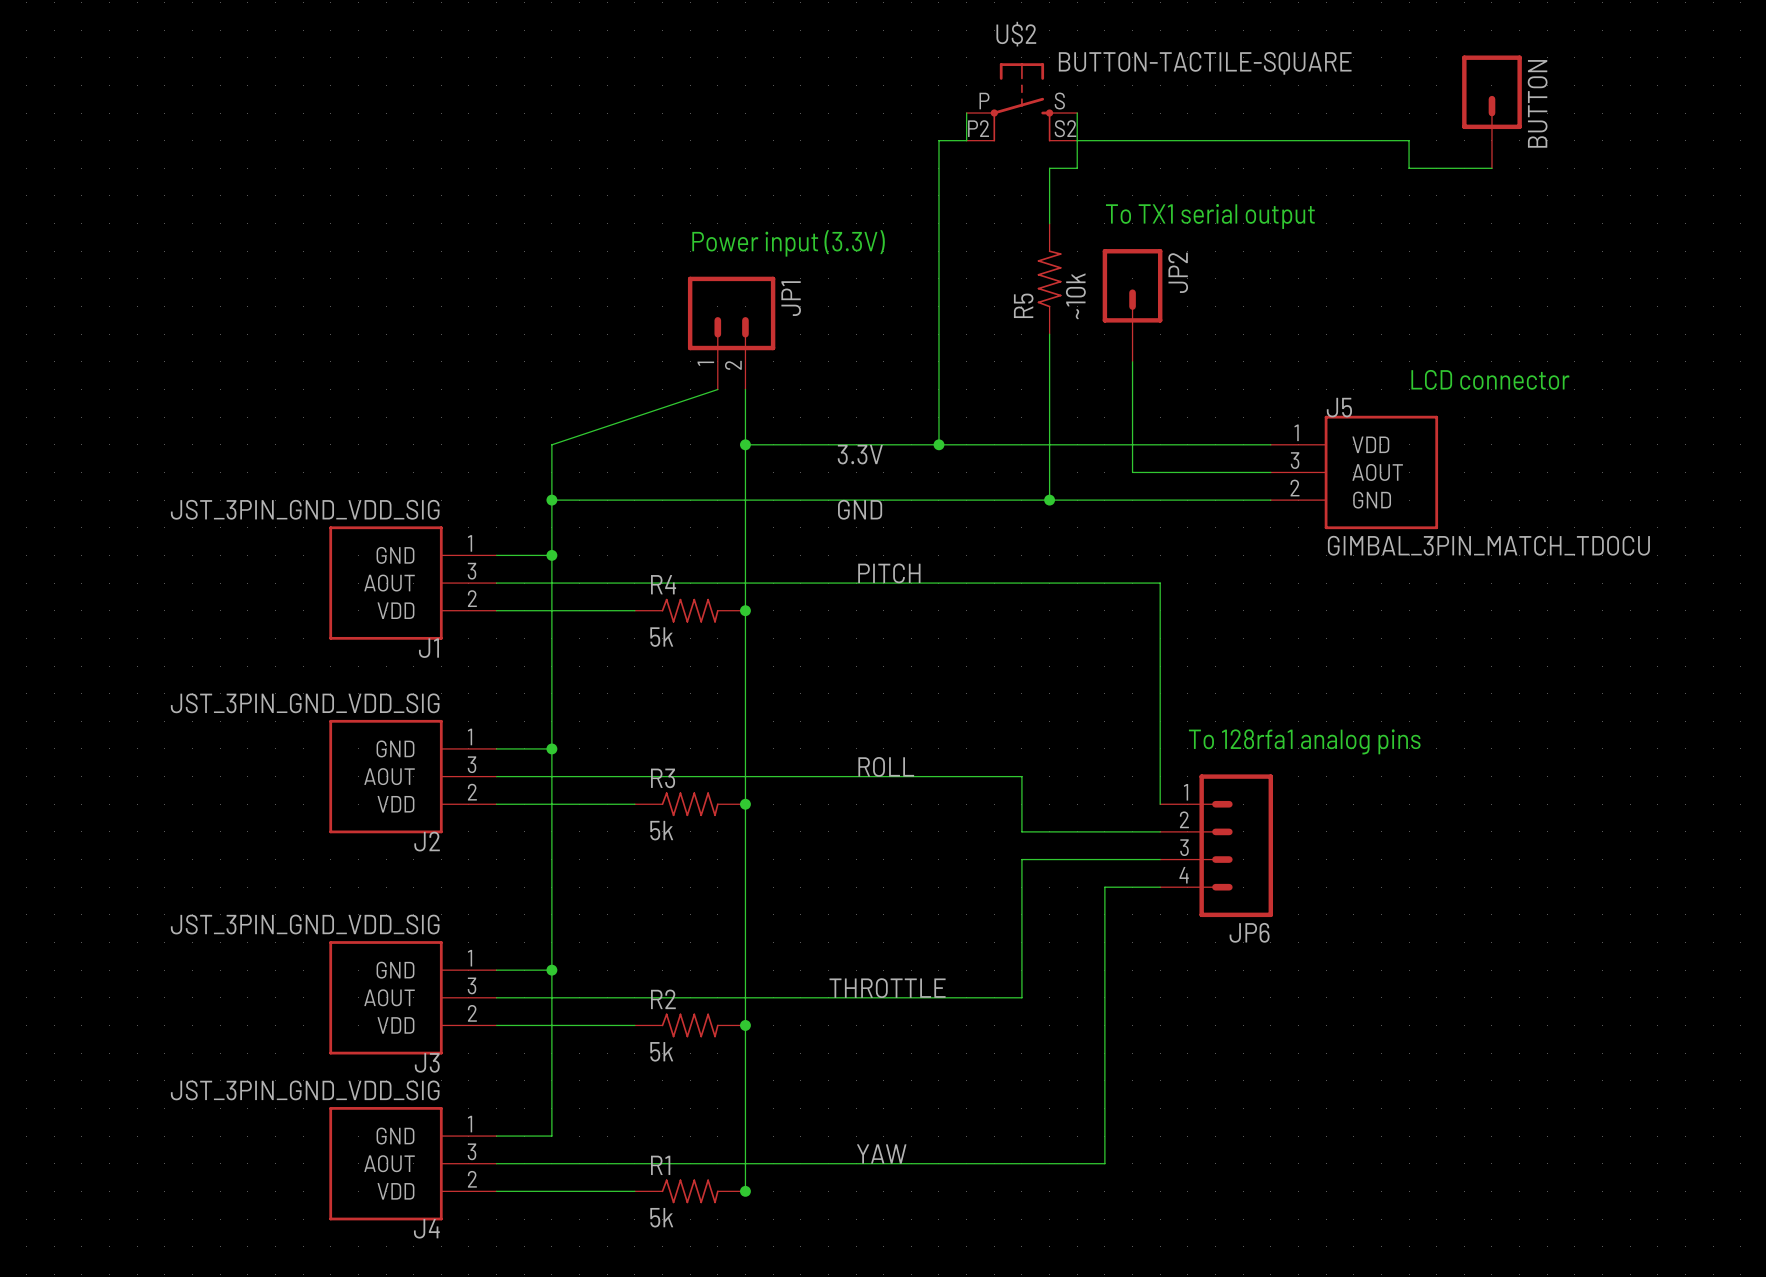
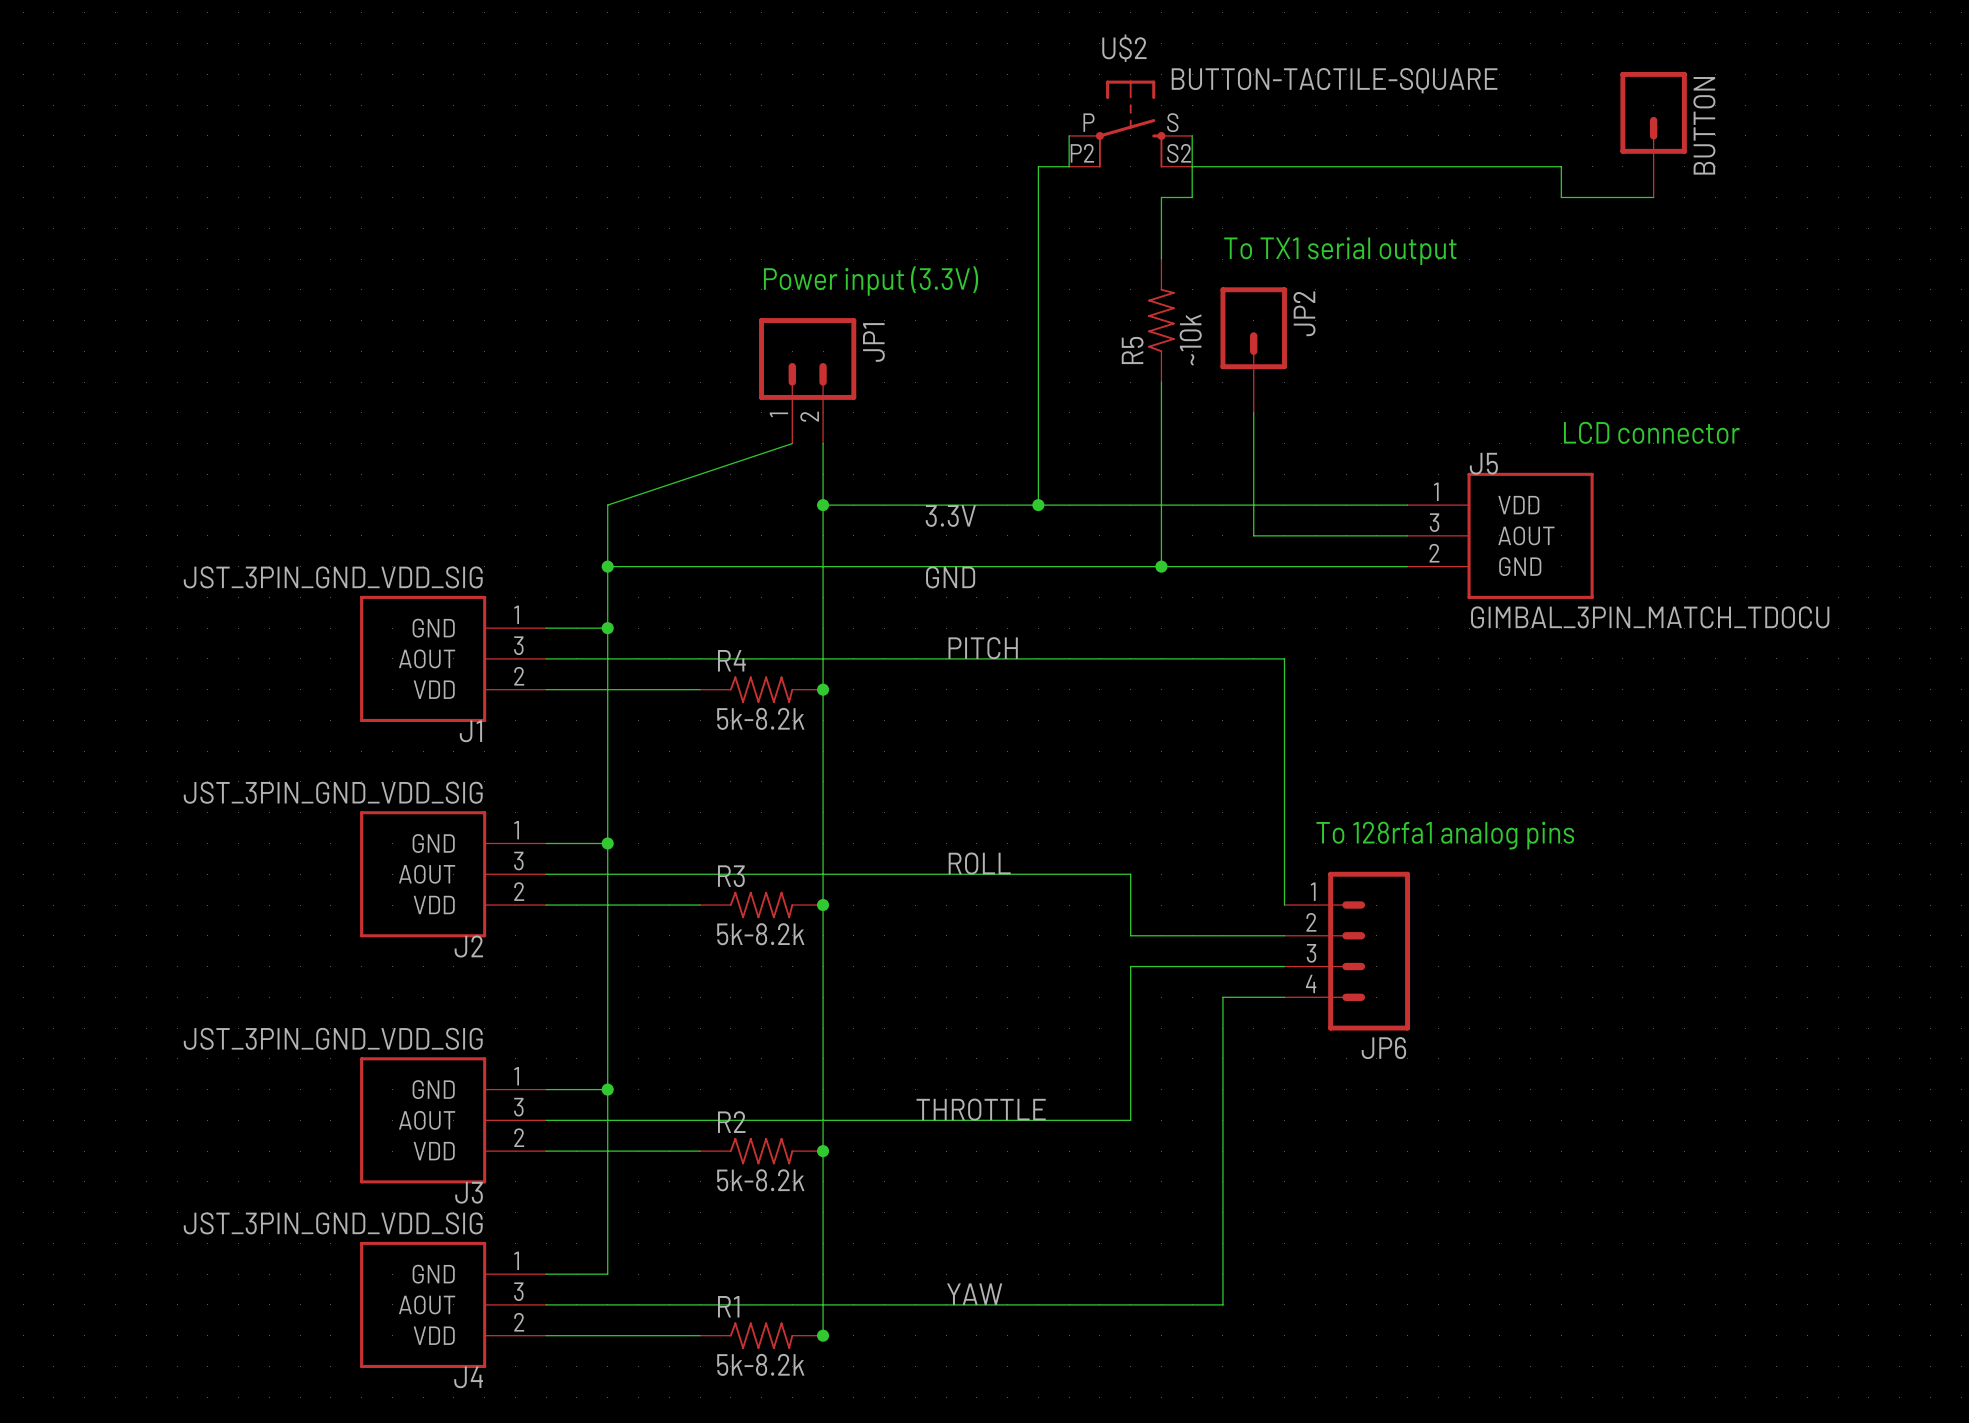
R4 value: 5k (661, 637) -> 5k-8.2k (760, 718)
R3 value: 5k (661, 830) -> 5k-8.2k (760, 934)
R2 value: 5k (661, 1051) -> 5k-8.2k (760, 1180)
R1 value: 5k (661, 1217) -> 5k-8.2k (760, 1364)

